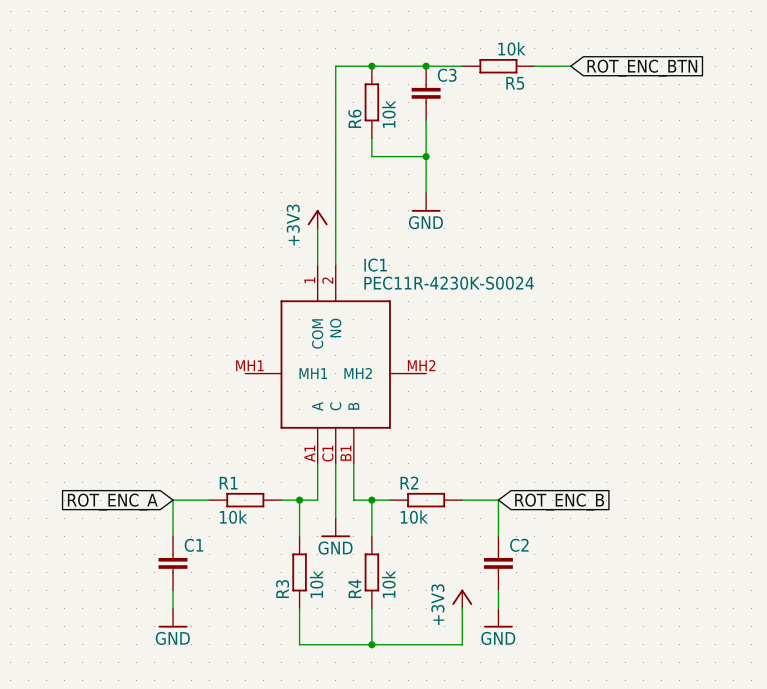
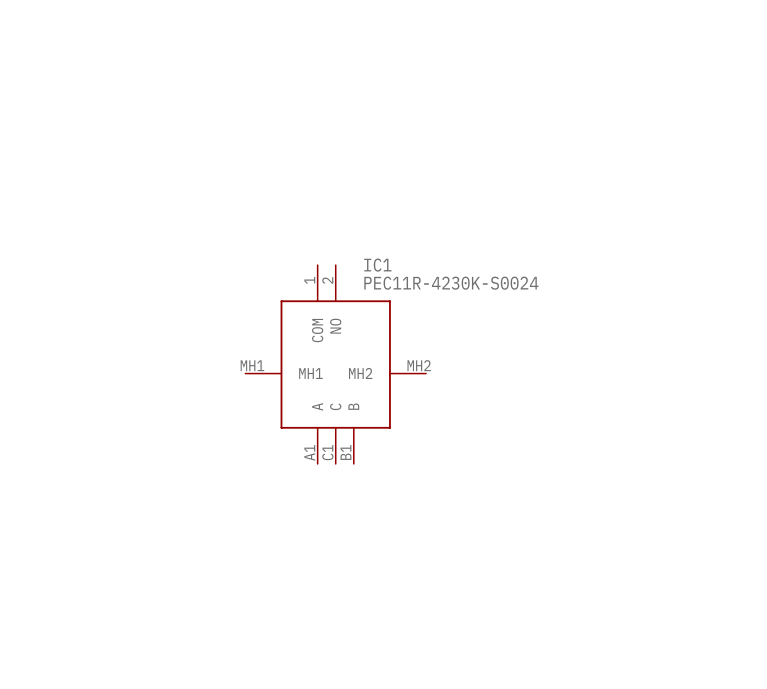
junction: (371, 66) -> none
junction: (426, 66) -> none
wire: (462, 66) (335, 66) (335, 265) -> none
R5: 10k (498, 66) -> none
wire: (534, 66) (570, 66) -> none
global label: ROT_ENC_BTN (642, 68) -> none
C3: (426, 93) -> none
R6: 10k (371, 102) -> none
wire: (426, 120) (426, 192) -> none
wire: (371, 138) (371, 156) (426, 156) -> none
junction: (426, 156) -> none
power symbol: GND (426, 202) -> none
power symbol: +3V3 (317, 219) -> none
wire: (317, 228) (317, 265) -> none
wire: (317, 463) (317, 500) (281, 500) -> none
wire: (335, 463) (335, 518) -> none
wire: (353, 463) (353, 500) (389, 500) -> none
wire: (209, 500) (173, 500) (173, 536) -> none
R1: 10k (245, 500) -> none
wire: (299, 500) (299, 536) -> none
junction: (299, 500) -> none
wire: (371, 500) (371, 536) -> none
junction: (371, 500) -> none
R2: 10k (426, 500) -> none
wire: (462, 500) (498, 500) (498, 536) -> none
global label: ROT_ENC_A (112, 502) -> none
global label: ROT_ENC_B (559, 502) -> none
power symbol: GND (335, 527) -> none
C1: (173, 563) -> none
C2: (498, 563) -> none
R3: 10k (299, 572) -> none
R4: 10k (371, 572) -> none
wire: (173, 590) (173, 608) -> none
wire: (498, 590) (498, 608) -> none
power symbol: +3V3 (462, 599) -> none
wire: (299, 608) (299, 644) (462, 644) (462, 608) -> none
wire: (371, 608) (371, 644) -> none
power symbol: GND (173, 618) -> none
power symbol: GND (498, 618) -> none
junction: (371, 644) -> none

